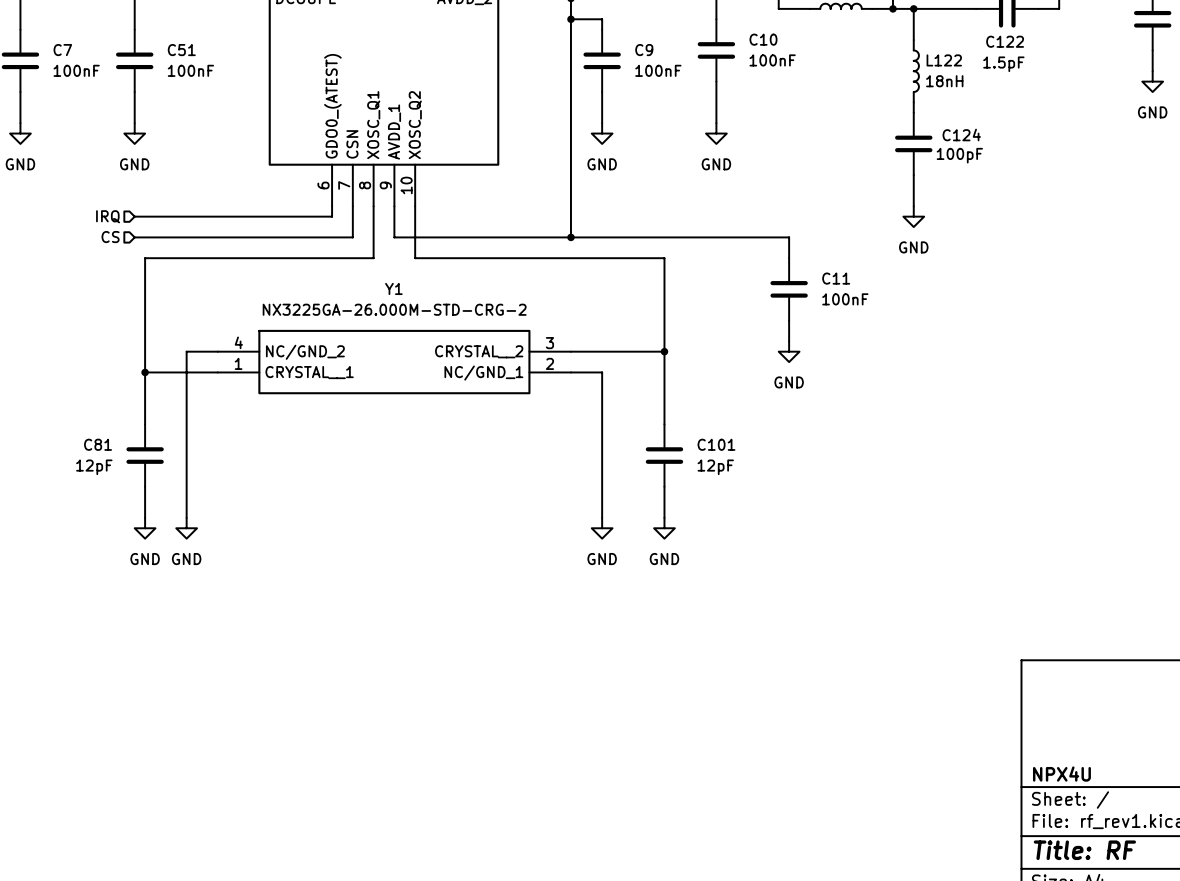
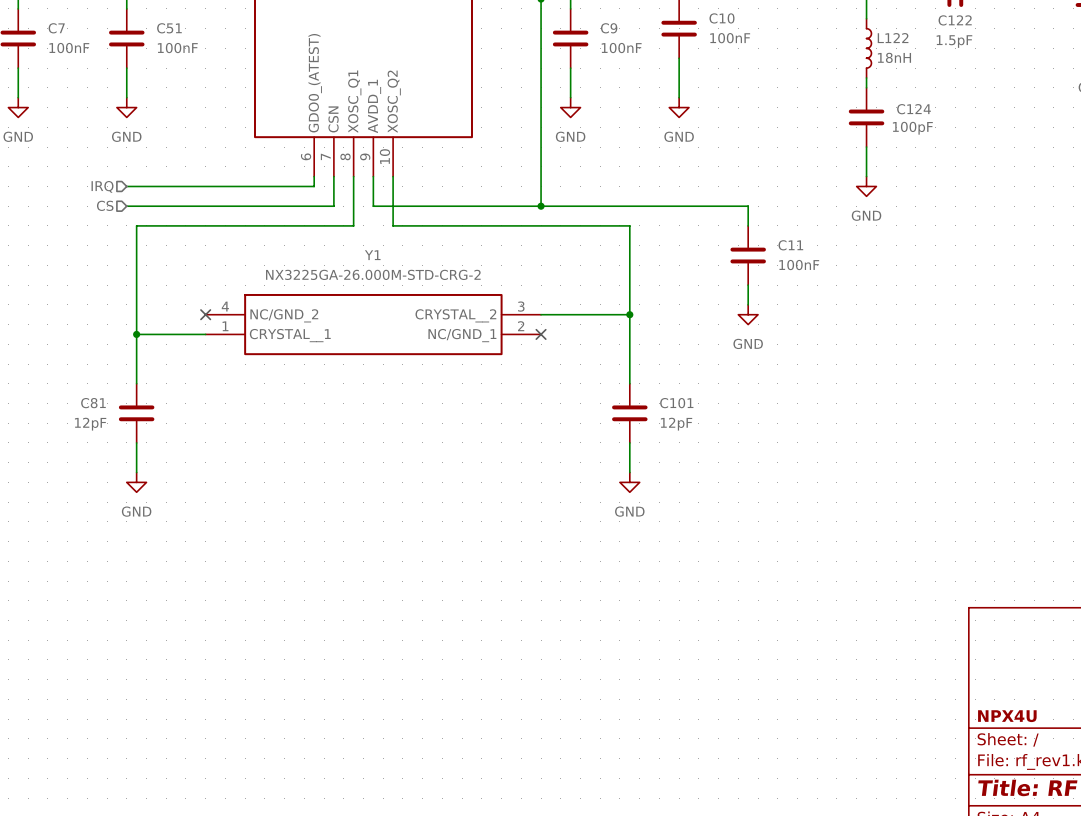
wire: (217, 351) (186, 351) (186, 517) -> none
no-connect mark: none -> (205, 314)
wire: (570, 372) (602, 372) (602, 517) -> none
no-connect mark: none -> (541, 334)
power symbol: GND (186, 528) -> none
power symbol: GND (602, 528) -> none

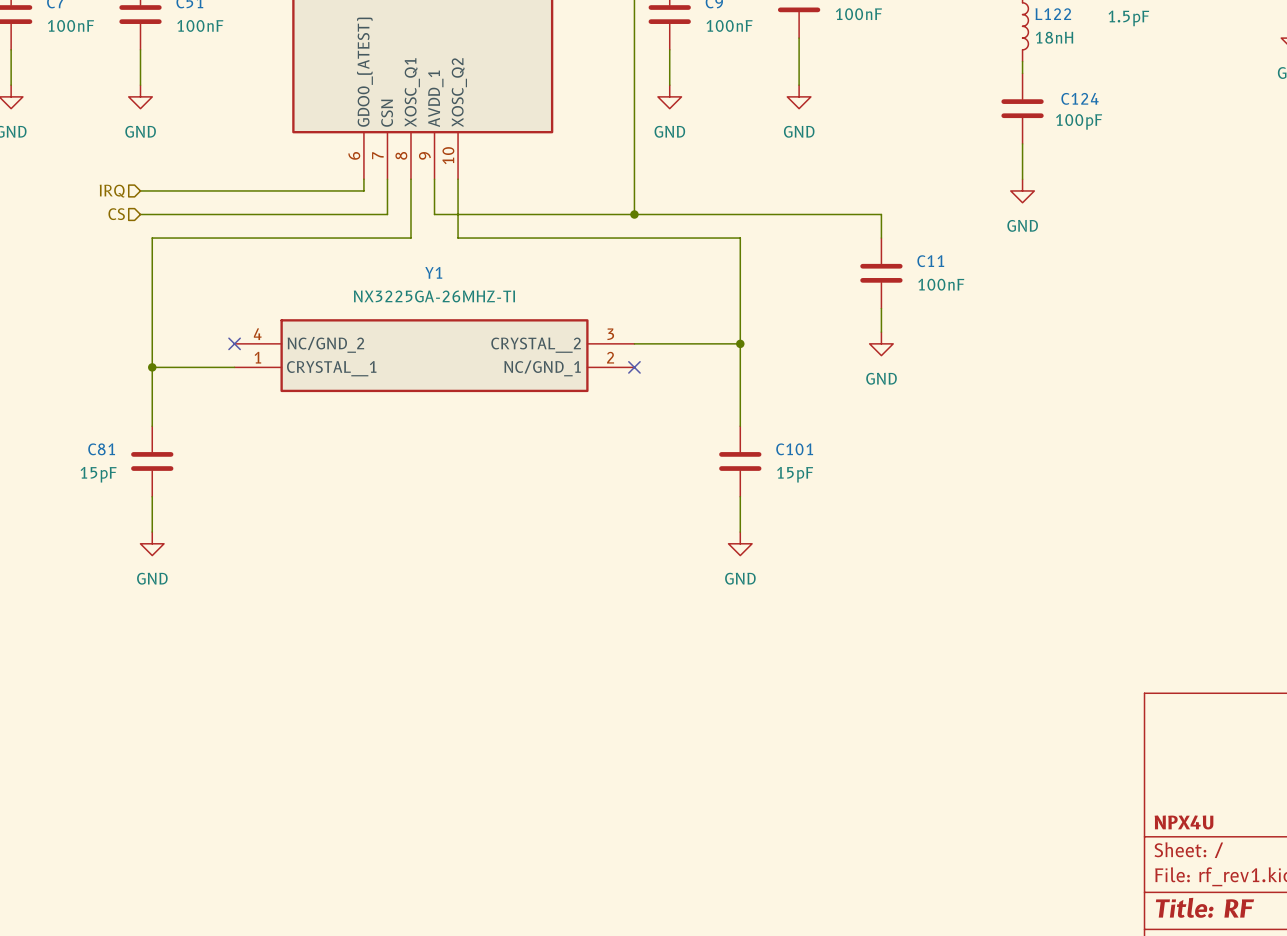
Y1 value: NX3225GA-26.000M-STD-CRG-2 (373, 274) -> NX3225GA-26MHZ-TI (434, 296)
C81 value: 12pF (90, 424) -> 15pF (98, 474)
C101 value: 12pF (676, 424) -> 15pF (795, 474)

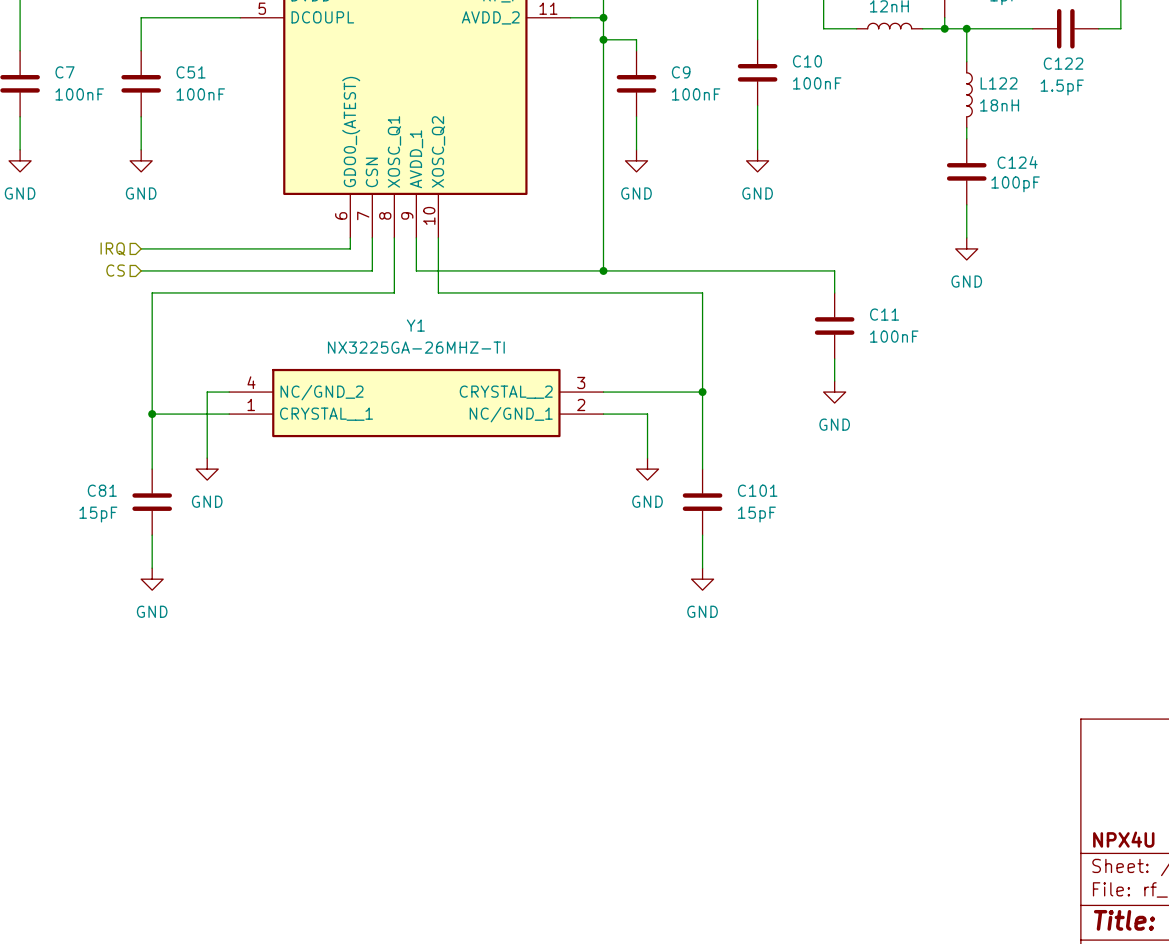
wire: none -> (229, 392) (207, 392) (207, 458)
no-connect mark: (234, 343) -> none
wire: none -> (603, 414) (647, 414) (647, 458)
no-connect mark: (634, 367) -> none
power symbol: none -> GND (207, 469)
power symbol: none -> GND (647, 469)

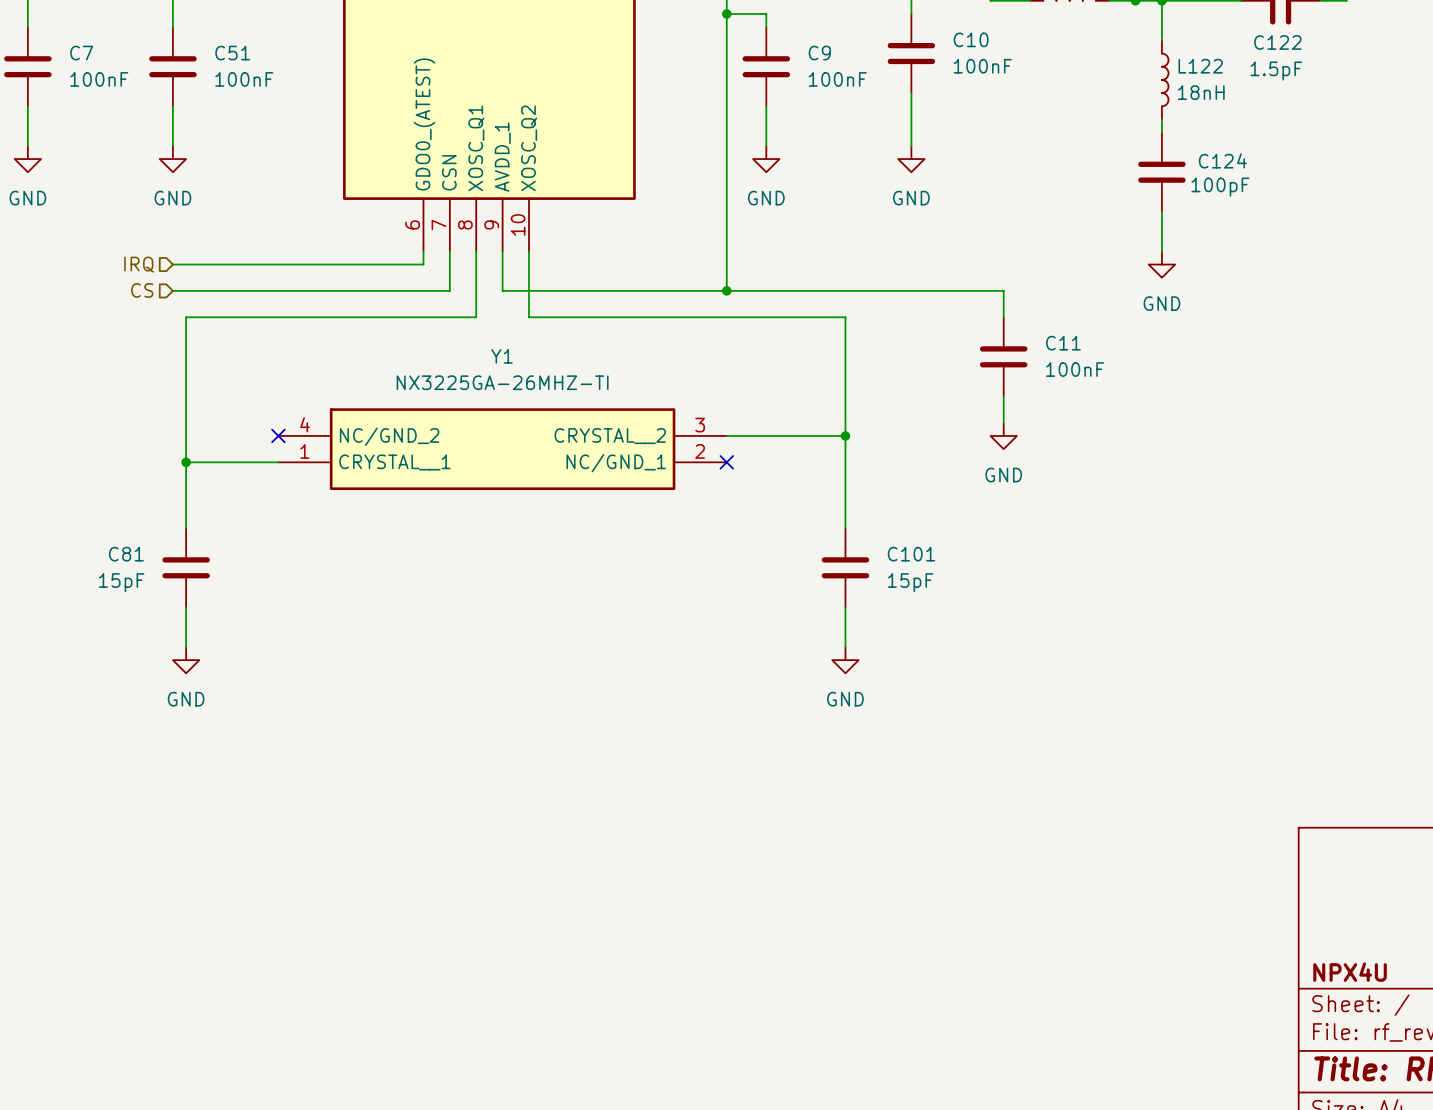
wire: (229, 392) (207, 392) (207, 458) -> none
no-connect mark: none -> (278, 435)
wire: (603, 414) (647, 414) (647, 458) -> none
no-connect mark: none -> (726, 462)
power symbol: GND (207, 469) -> none
power symbol: GND (647, 469) -> none

